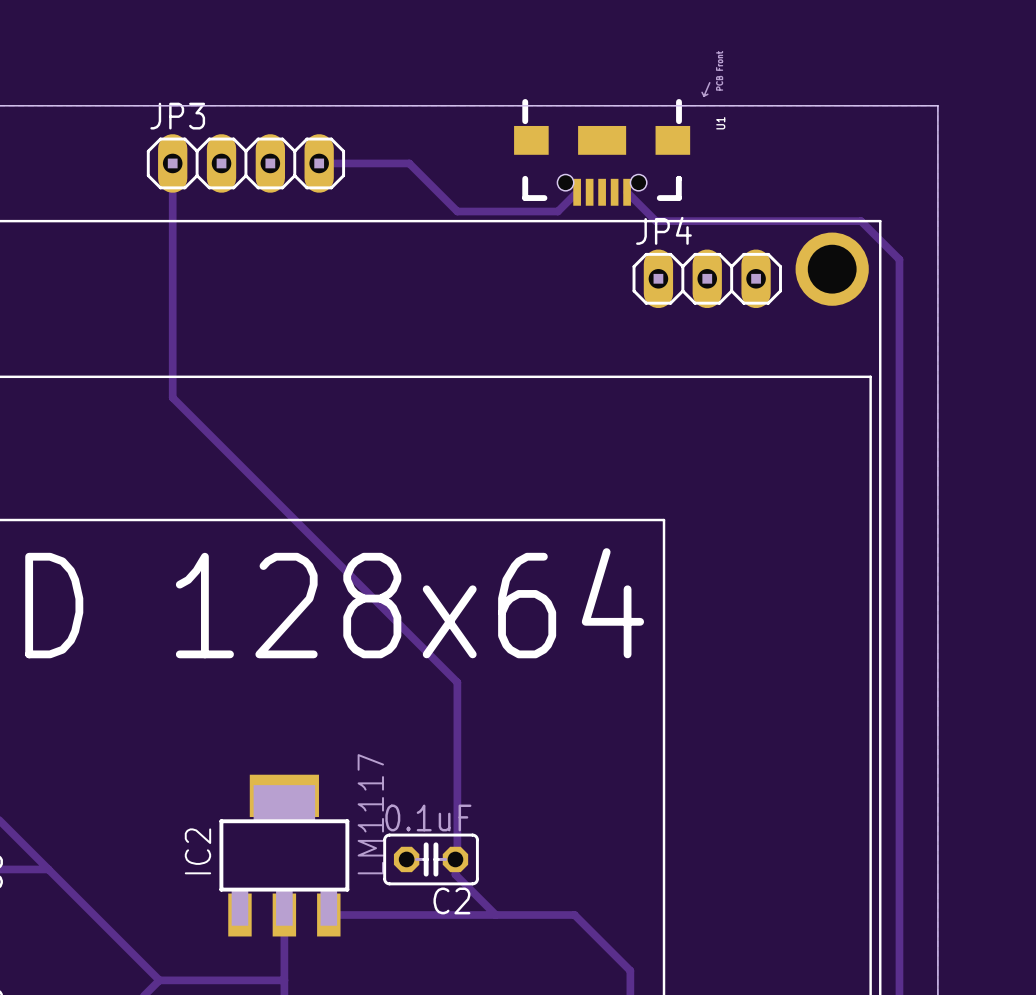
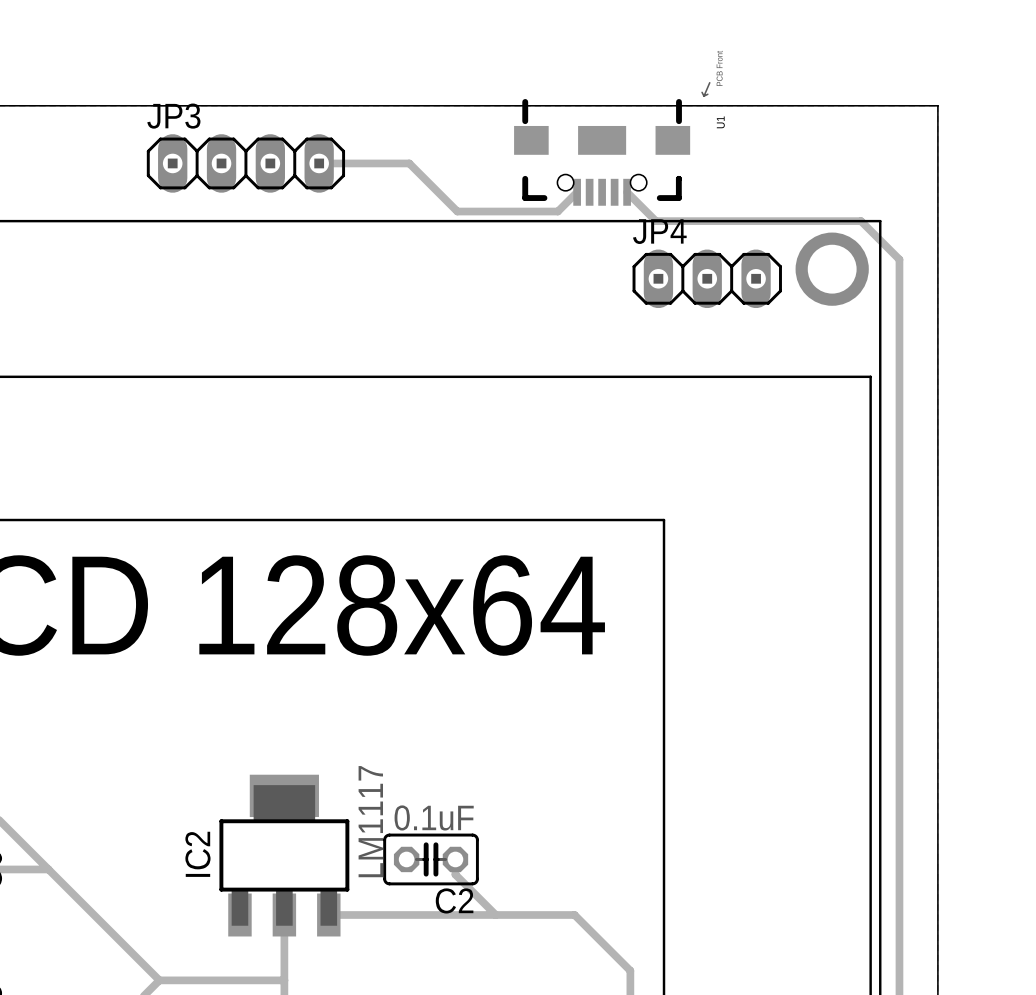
track: (172, 163) (172, 397) (457, 682) (457, 857) (455, 859) -> none

